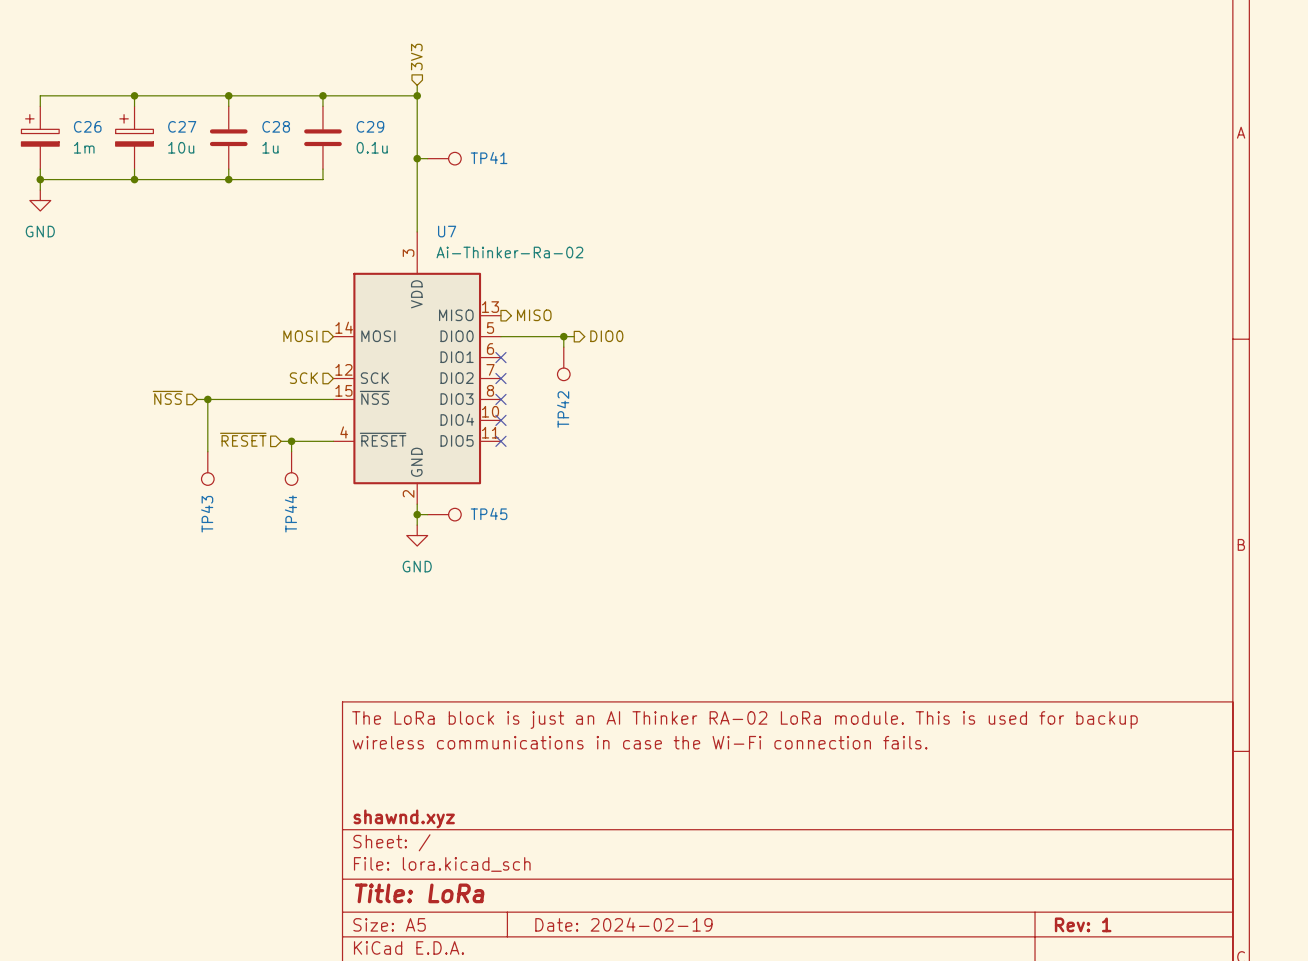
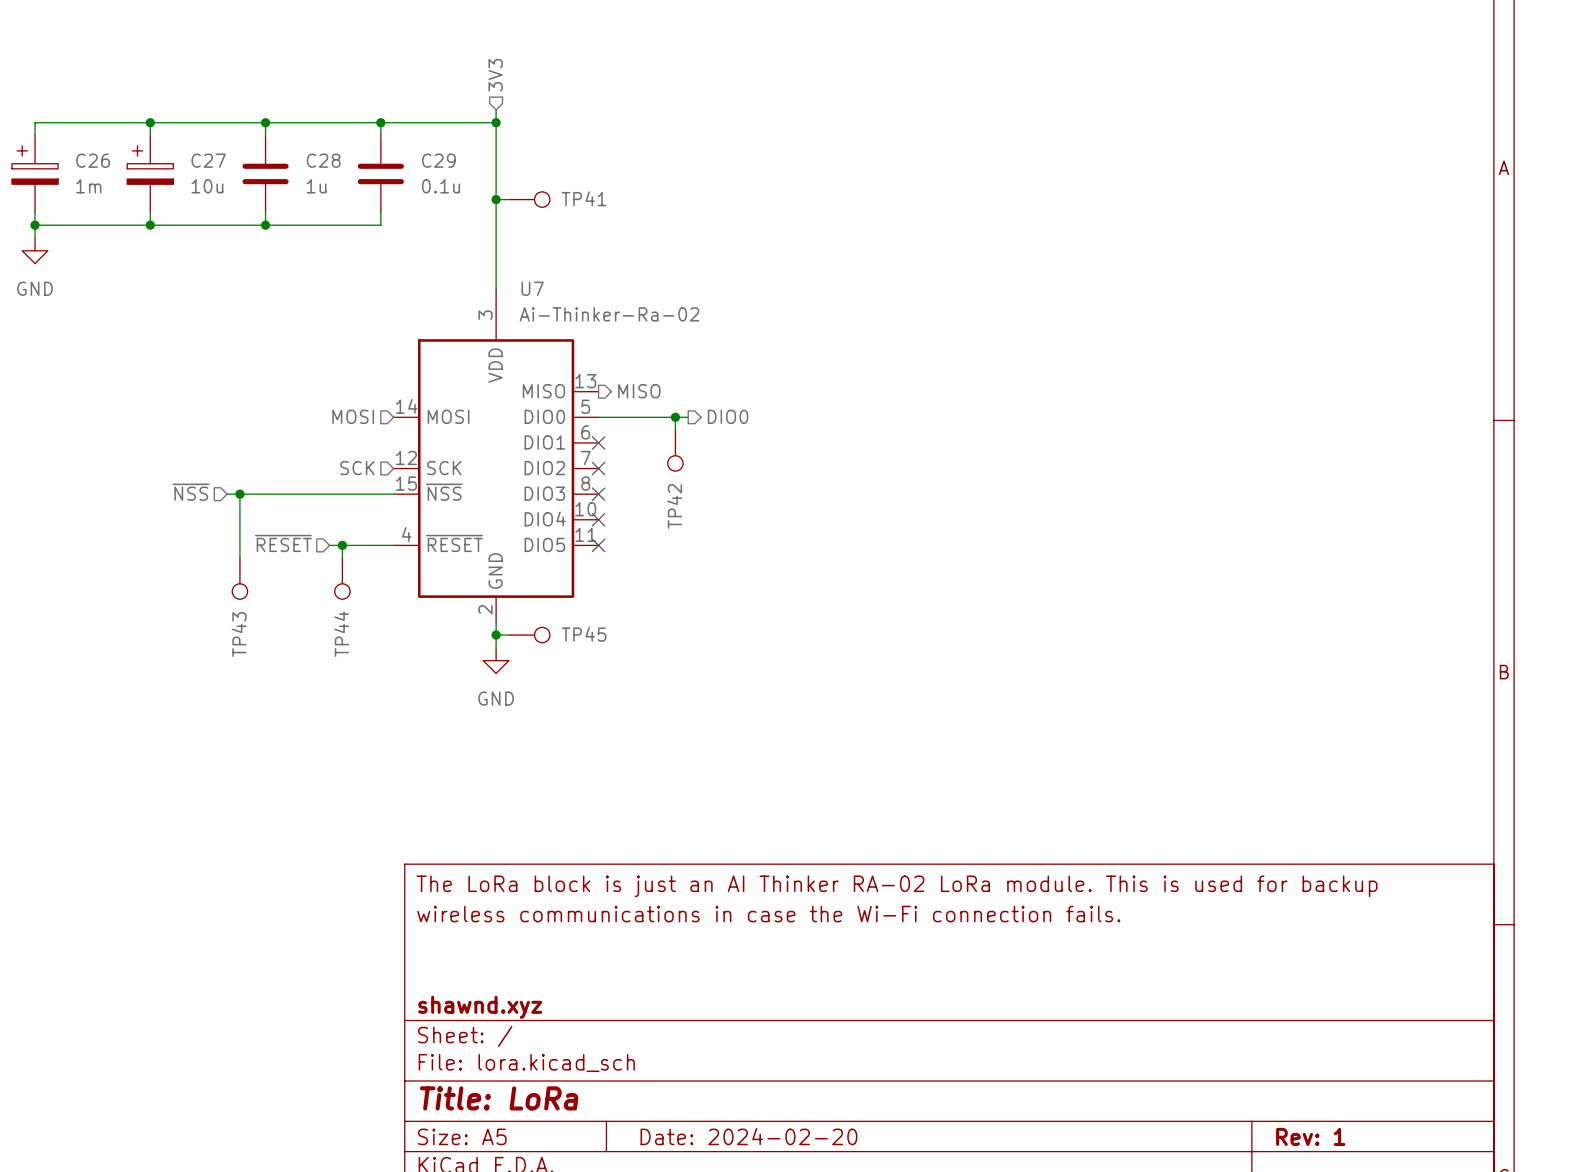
title block: Date: 2024-02-19 (623, 924) -> Date: 2024-02-20 (748, 1136)

